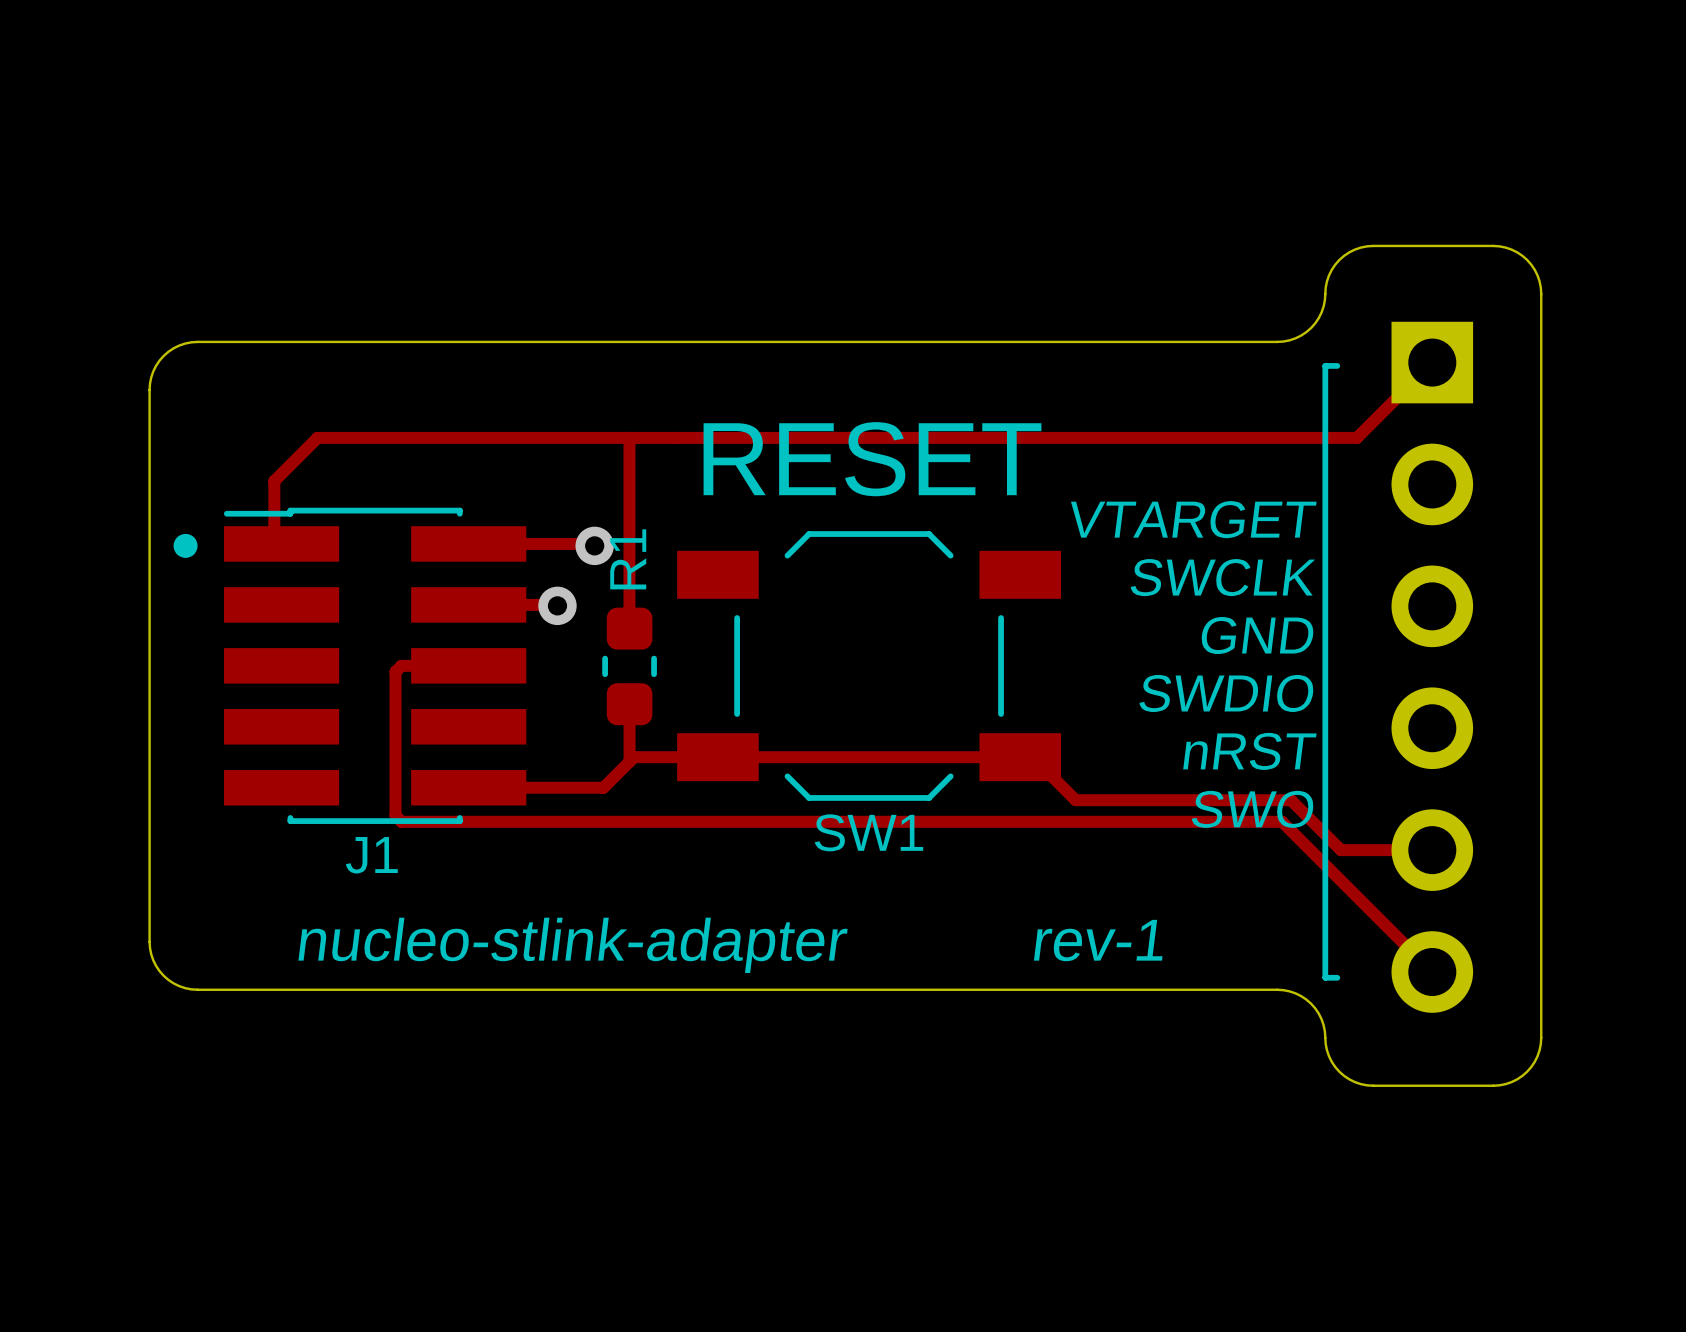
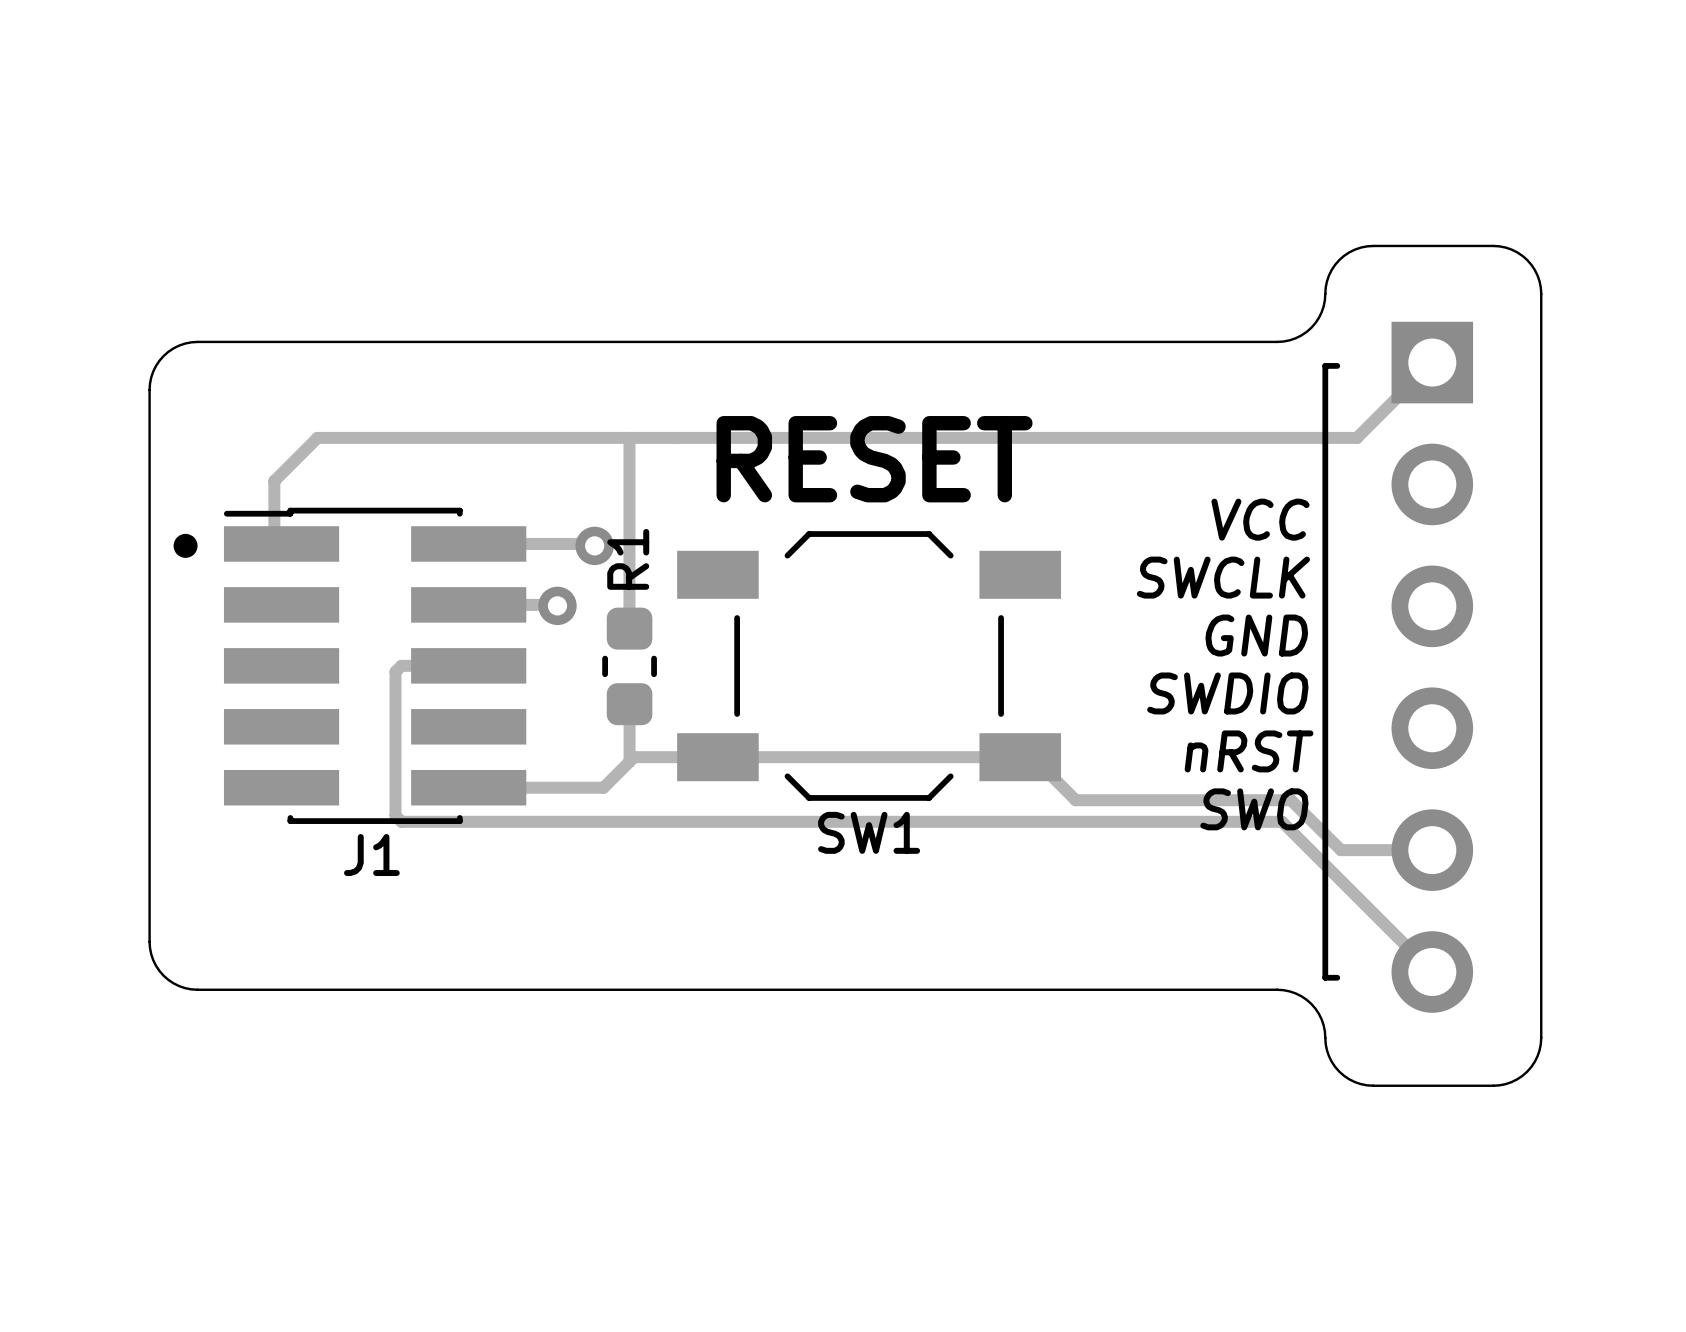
text: VTARGET (1193, 519) -> VCC (1260, 519)
text: rev-1 (1098, 940) -> none
text: nucleo-stlink-adapter (573, 945) -> none

